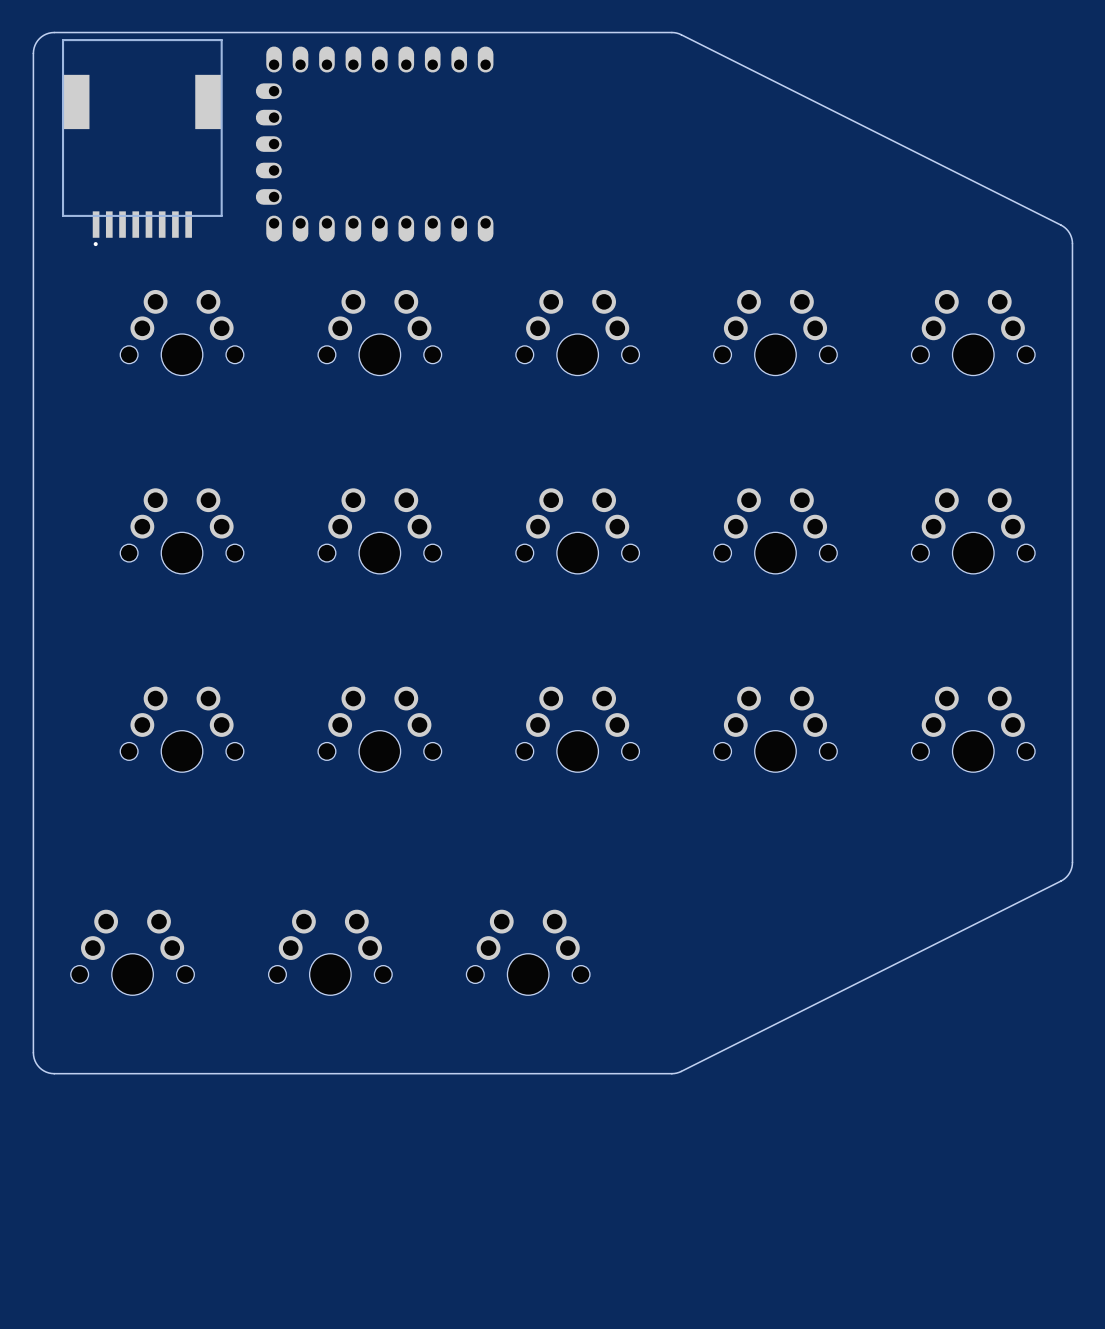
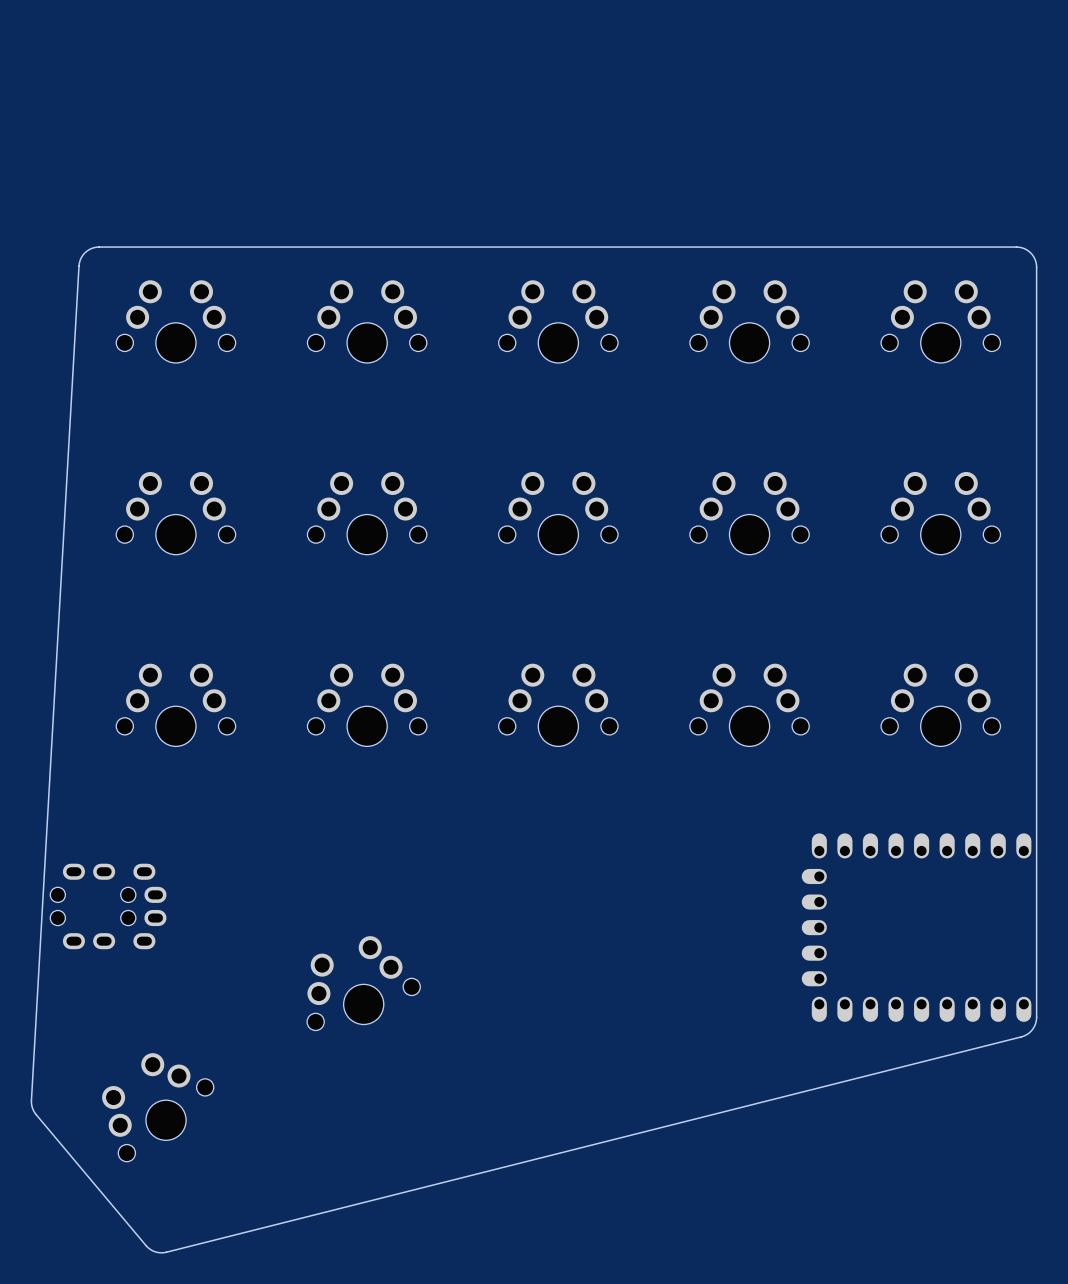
part: (142, 142) -> none
part: (374, 144) -> none
board edge: (1072, 243) (1069, 232) (1060, 225) (676, 33) (54, 32) (46, 34) (39, 38) (33, 50) (33, 1052) (34, 1060) (41, 1069) (54, 1073) (676, 1073) (1060, 881) (1069, 873) (1072, 862) -> (1036, 267) (1035, 259) (1030, 252) (1024, 248) (1016, 247) (99, 247) (85, 252) (79, 266) (32, 1107) (146, 1245) (153, 1251) (161, 1252) (1021, 1036) (1030, 1031) (1036, 1019) (1036, 833)
board edge: (1072, 243) (1072, 276) -> none
part: none -> (108, 906)
part: (132, 952) -> none
part: (330, 952) -> none
part: (528, 952) -> none
part: none -> (916, 927)
part: none -> (363, 983)
part: none -> (157, 1107)

